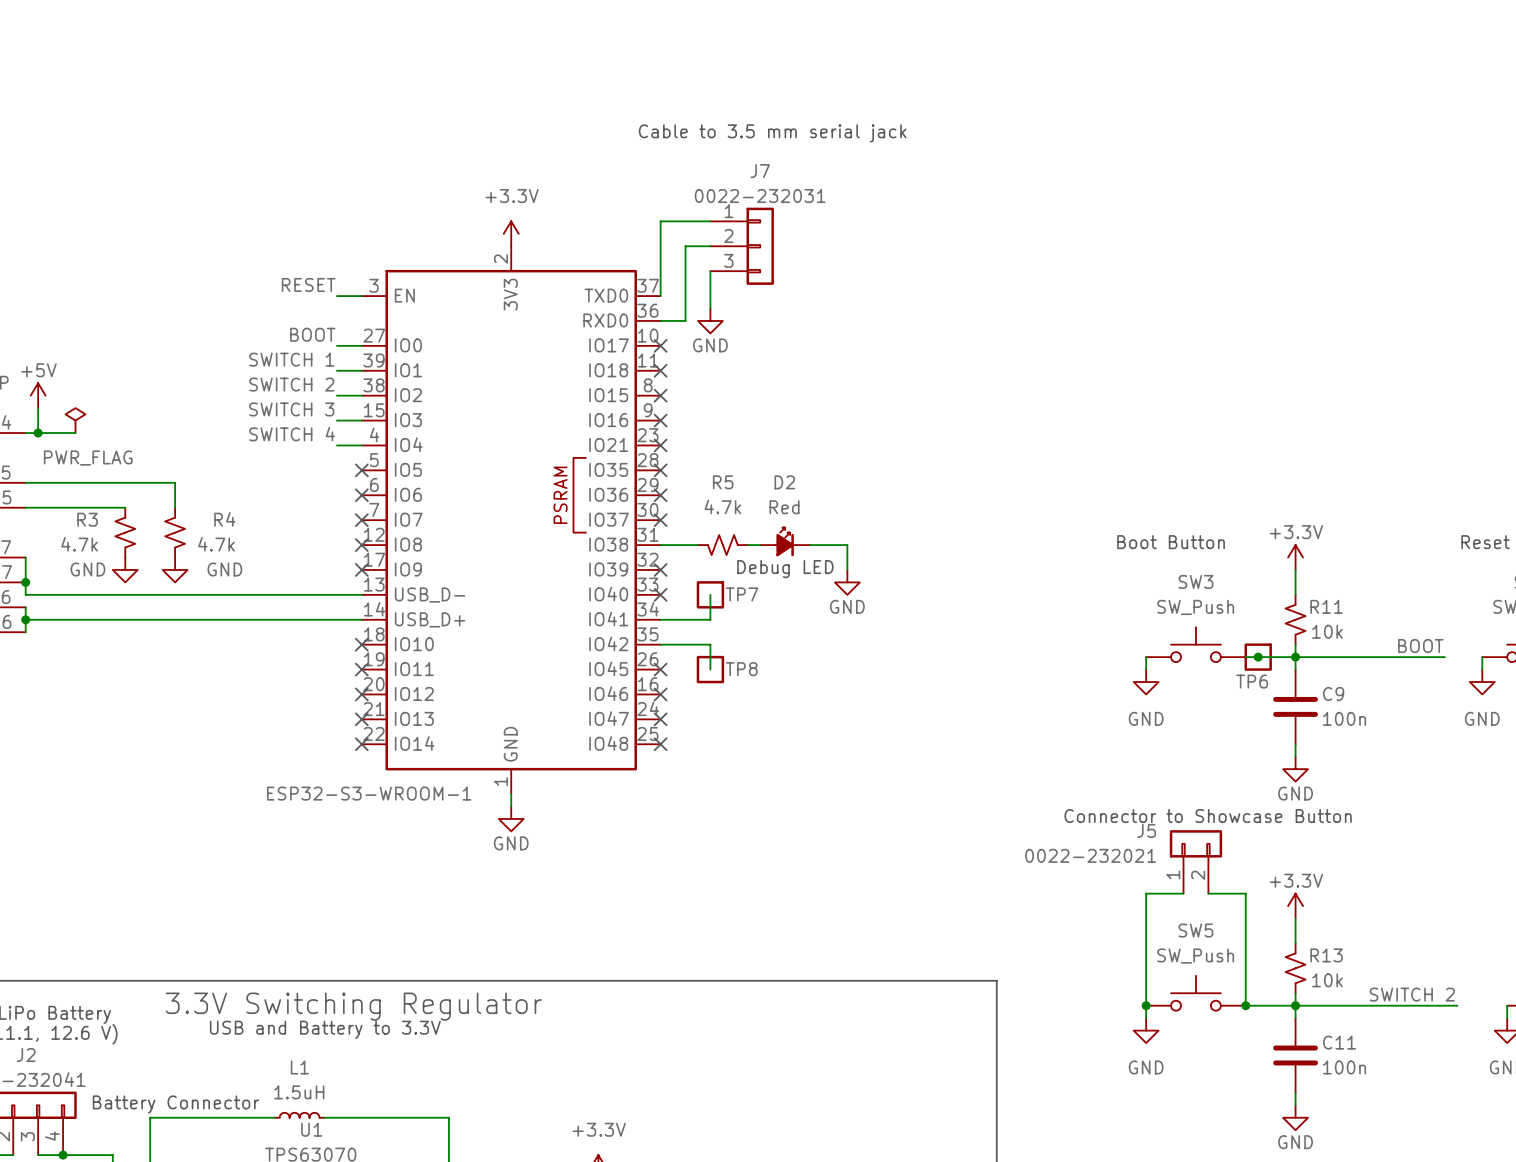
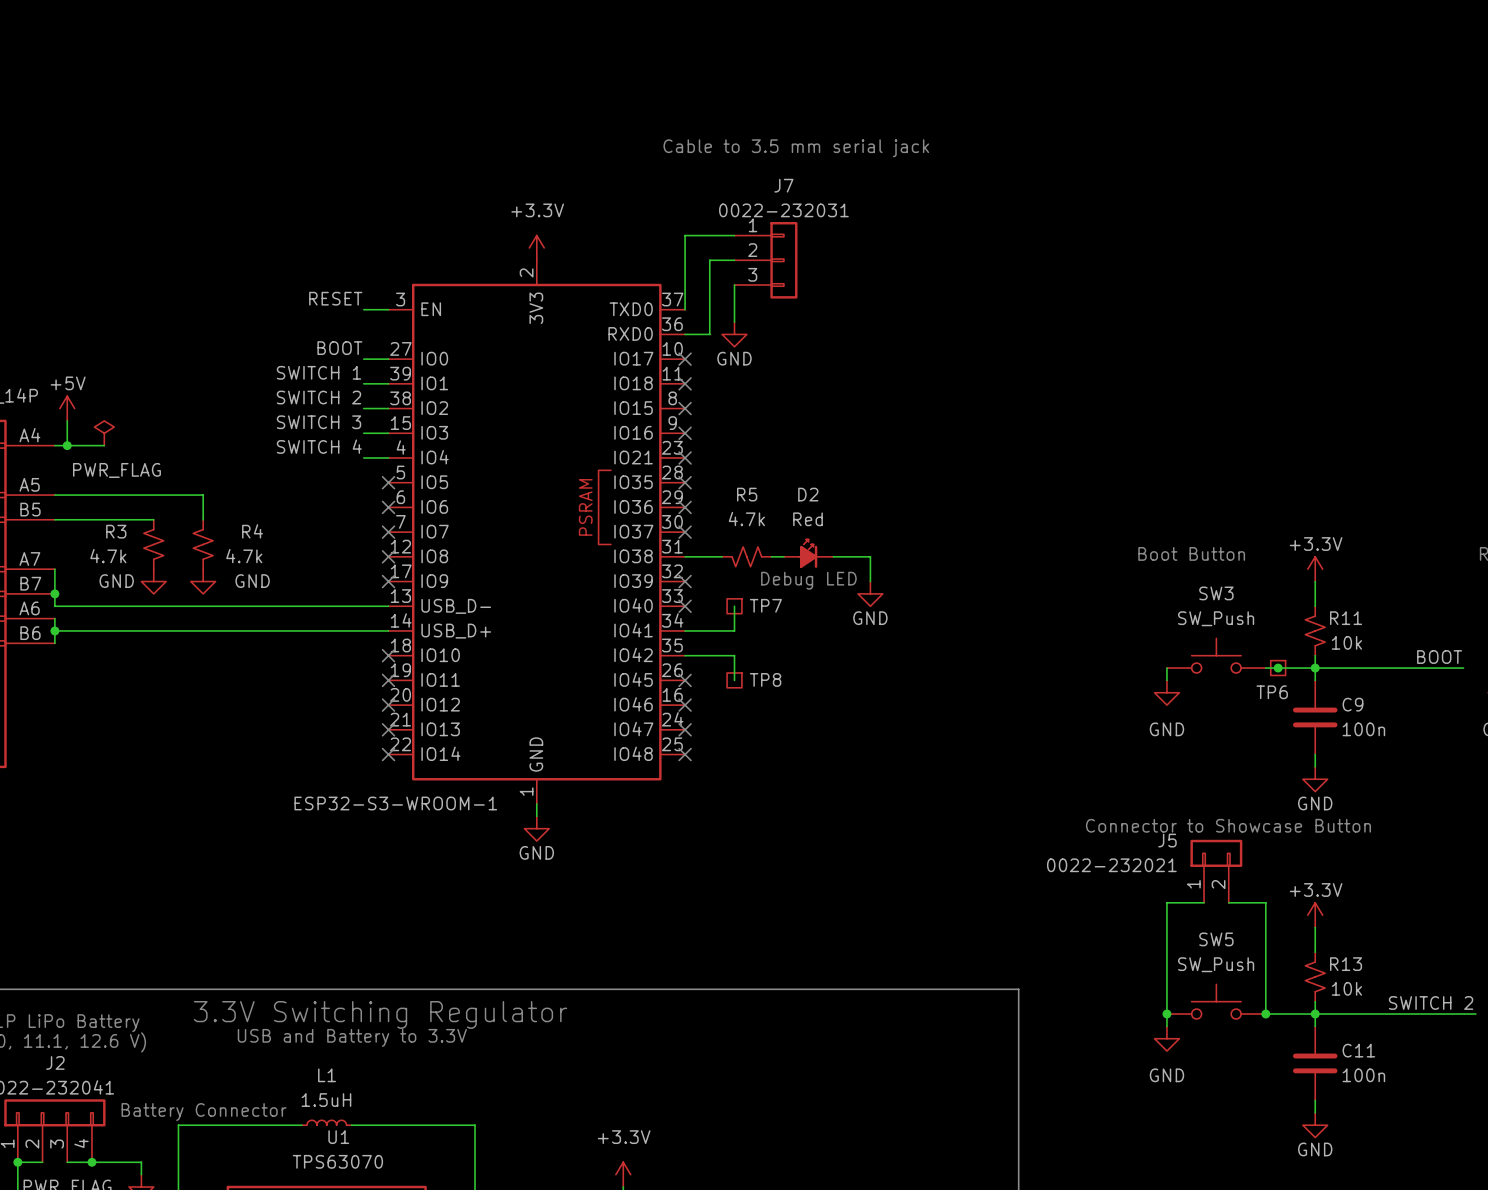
TP7 symbol: [696, 581, 725, 609] -> [727, 598, 742, 614]
TP6 symbol: [1244, 643, 1272, 671] -> [1270, 660, 1286, 676]
TP8 symbol: [696, 655, 725, 684] -> [727, 672, 742, 688]

